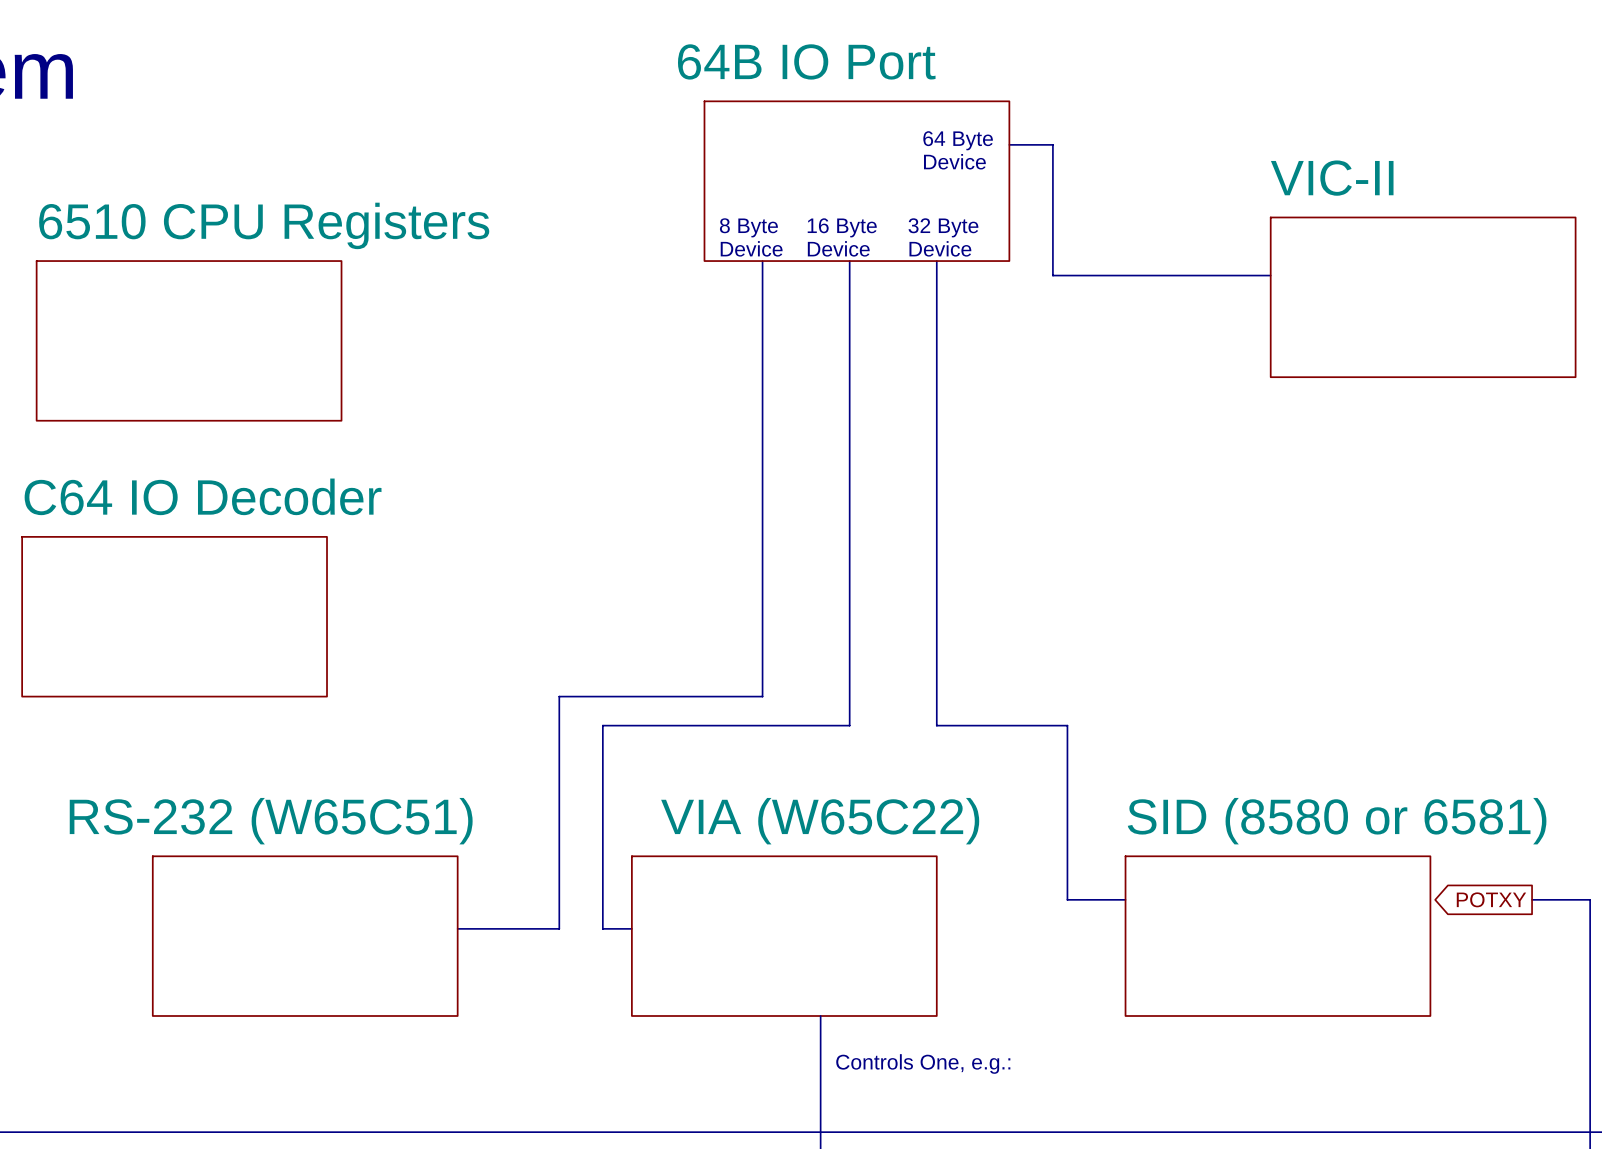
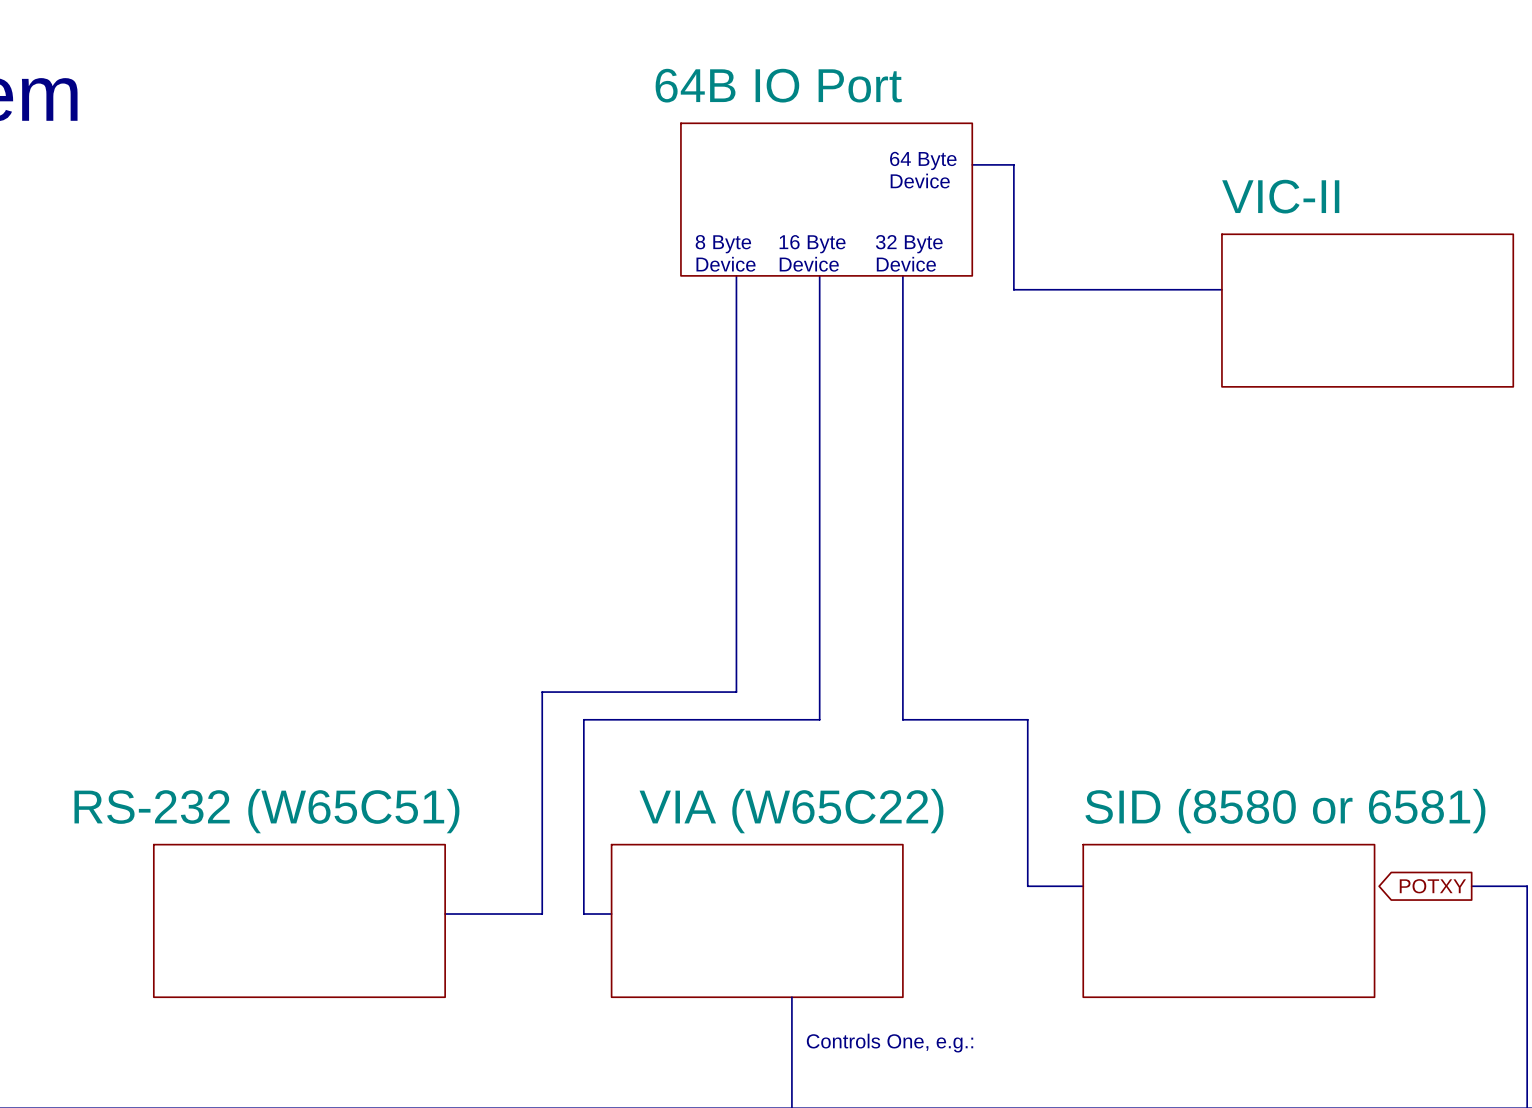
sheet 6510 CPU Registers: (189, 340) -> none
sheet C64 IO Decoder: (174, 616) -> none

